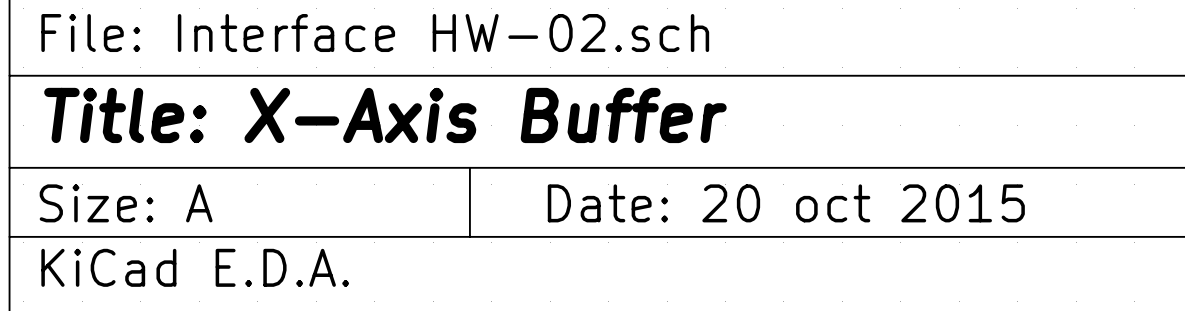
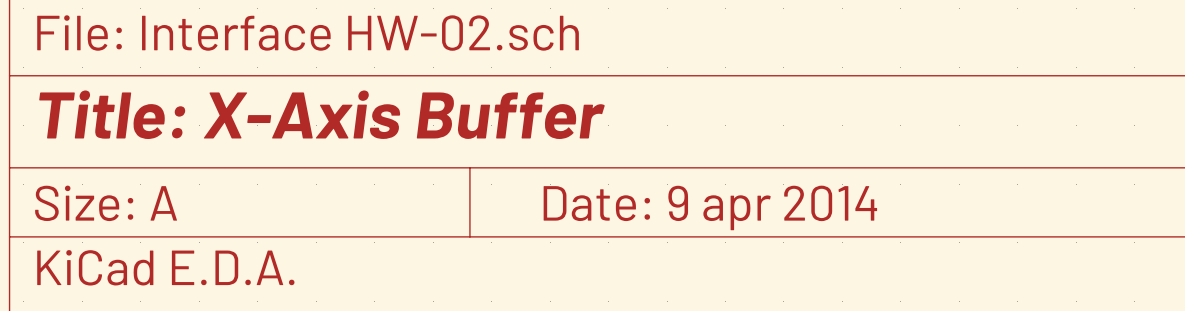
title block: Date: 20 oct 2015 (786, 203) -> Date: 9 apr 2014 (710, 207)

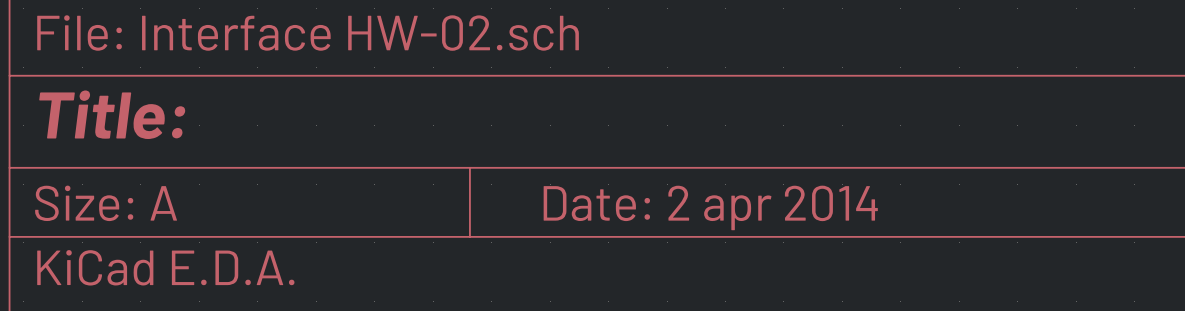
title block: Title: X-Axis Buffer (322, 114) -> Title: (112, 114)
title block: Date: 9 apr 2014 (710, 207) -> Date: 2 apr 2014 (710, 207)

